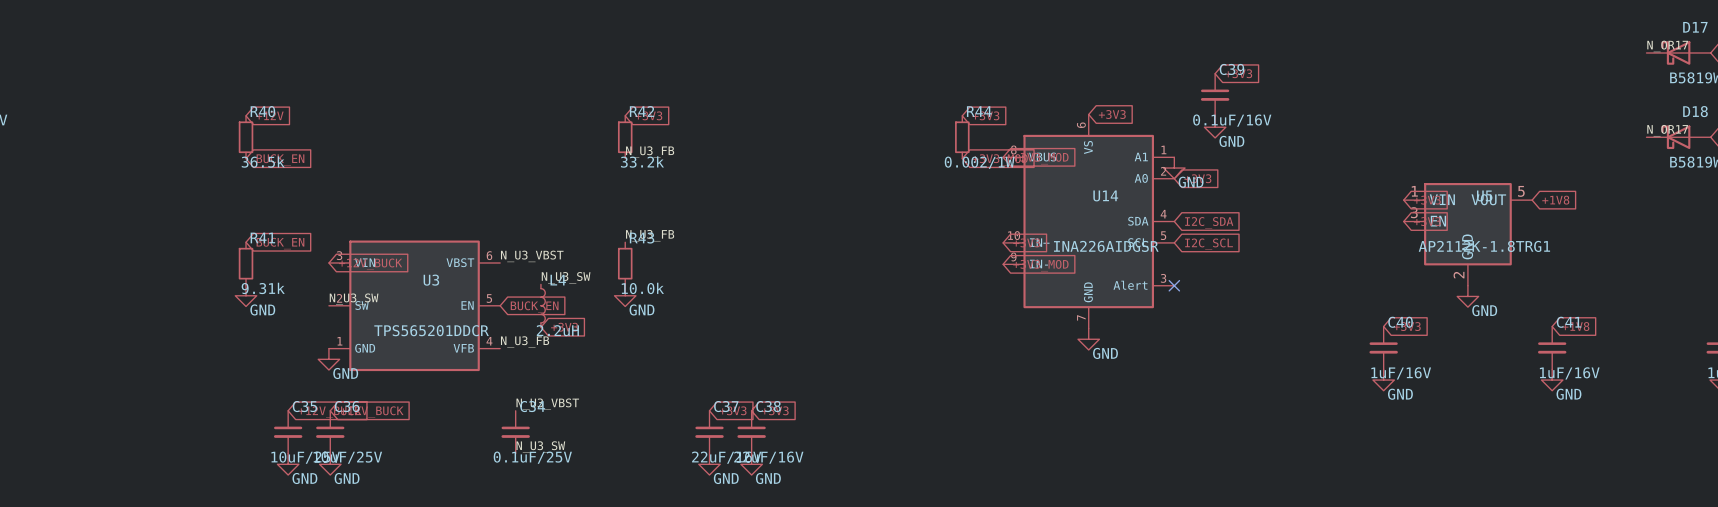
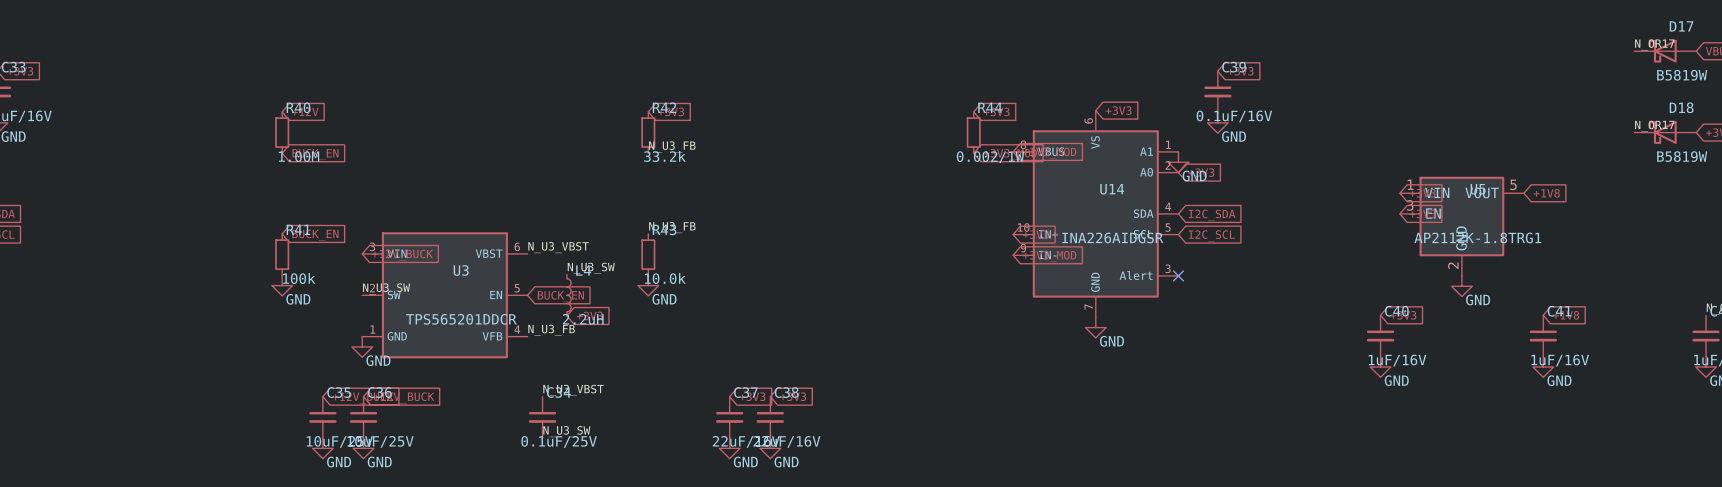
R40 value: 36.5k (263, 162) -> 1.00M (299, 156)
R41 value: 9.31k (263, 288) -> 100k (299, 278)

